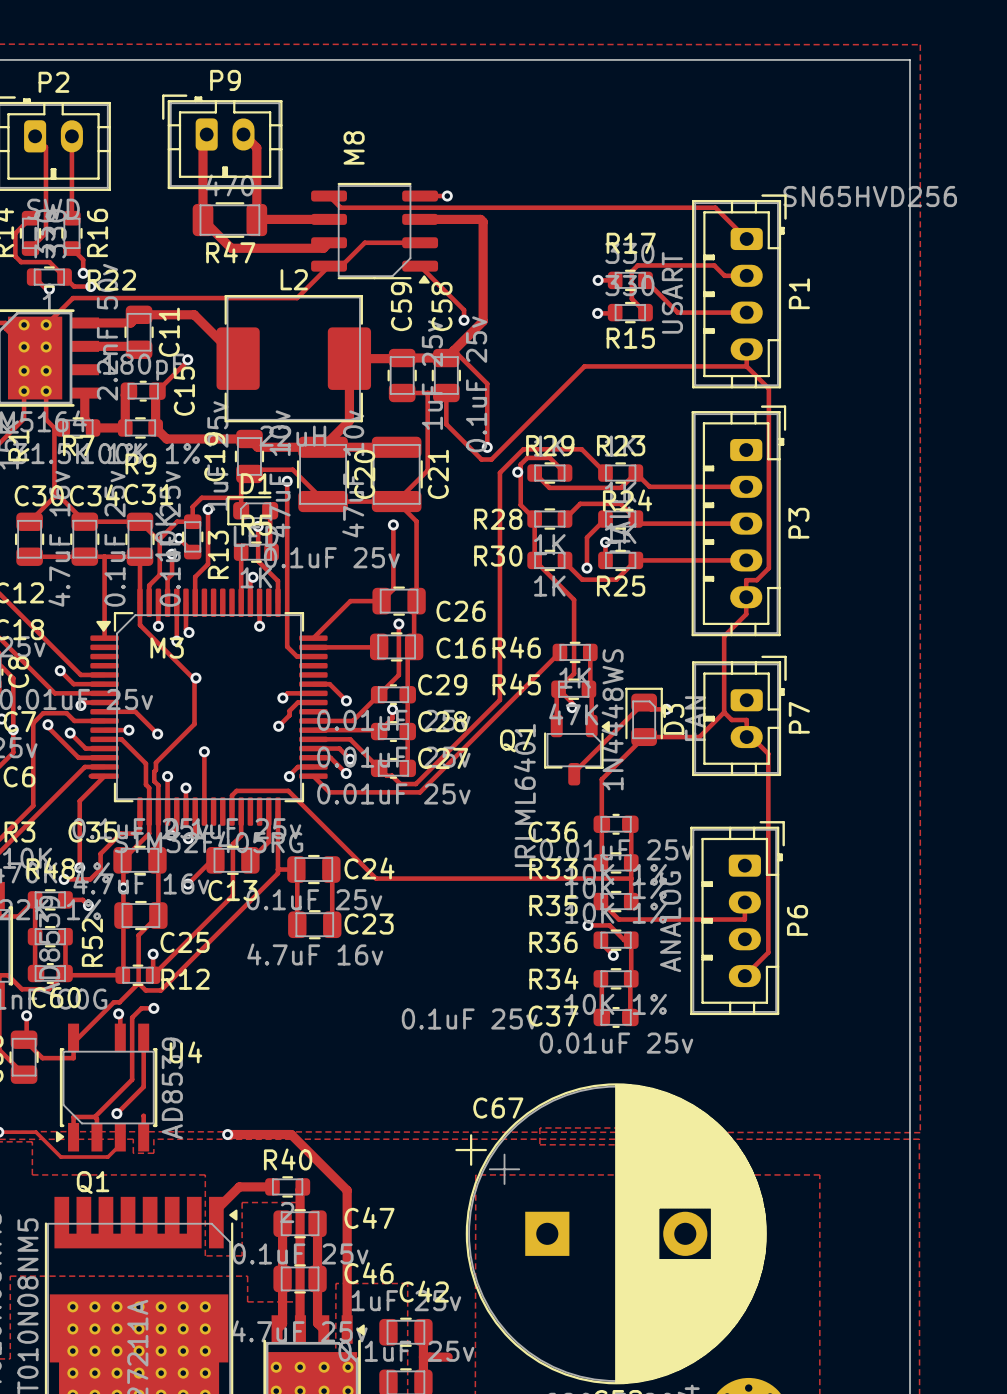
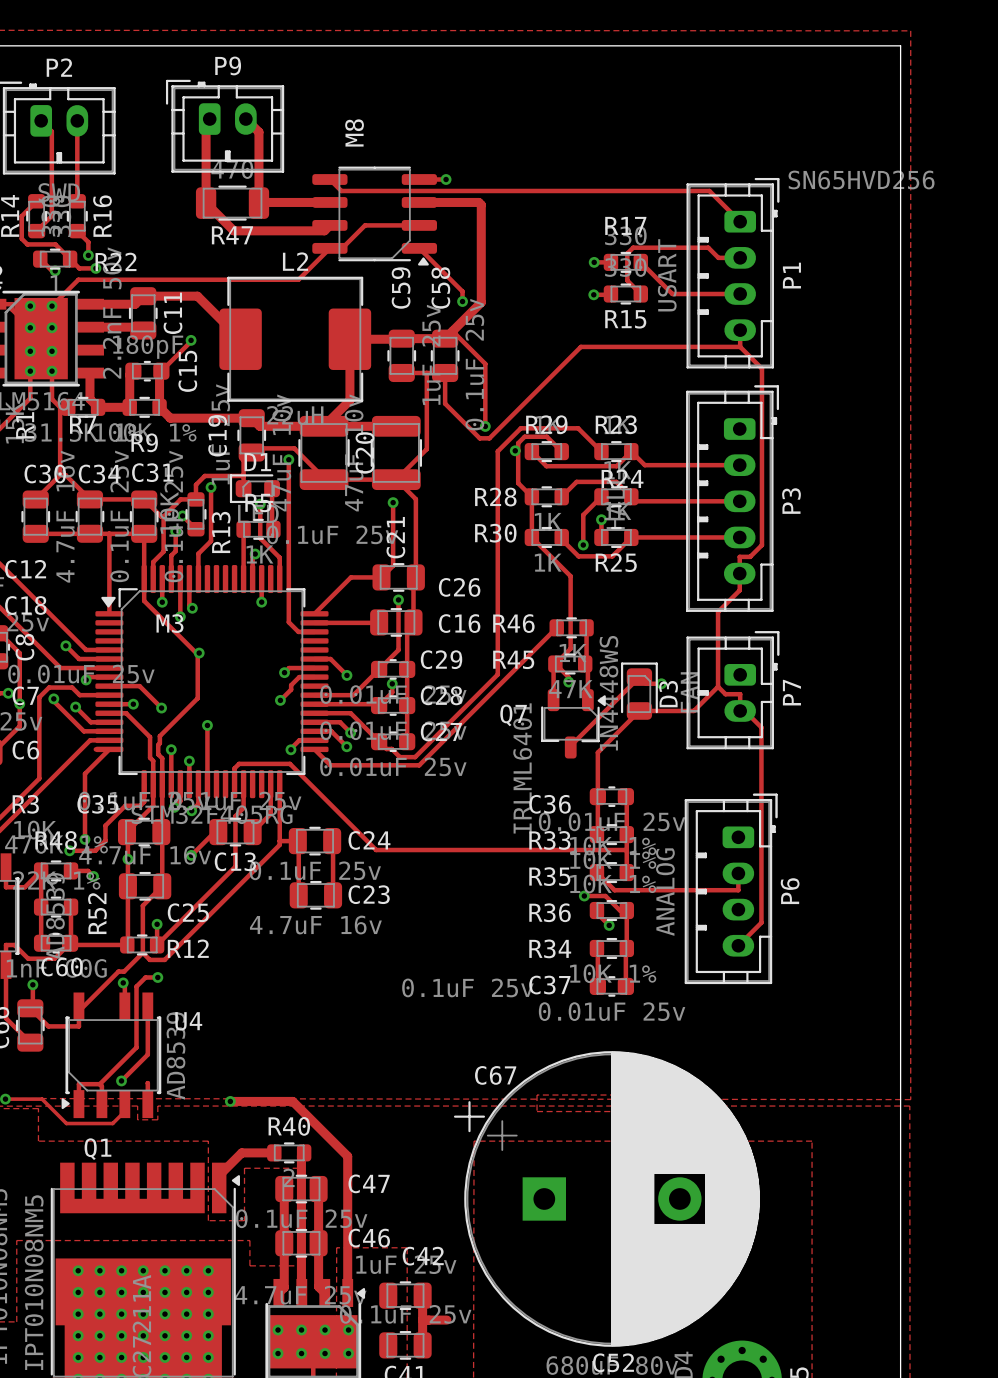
C21 name position: C21 (438, 474) -> C21 (395, 537)

